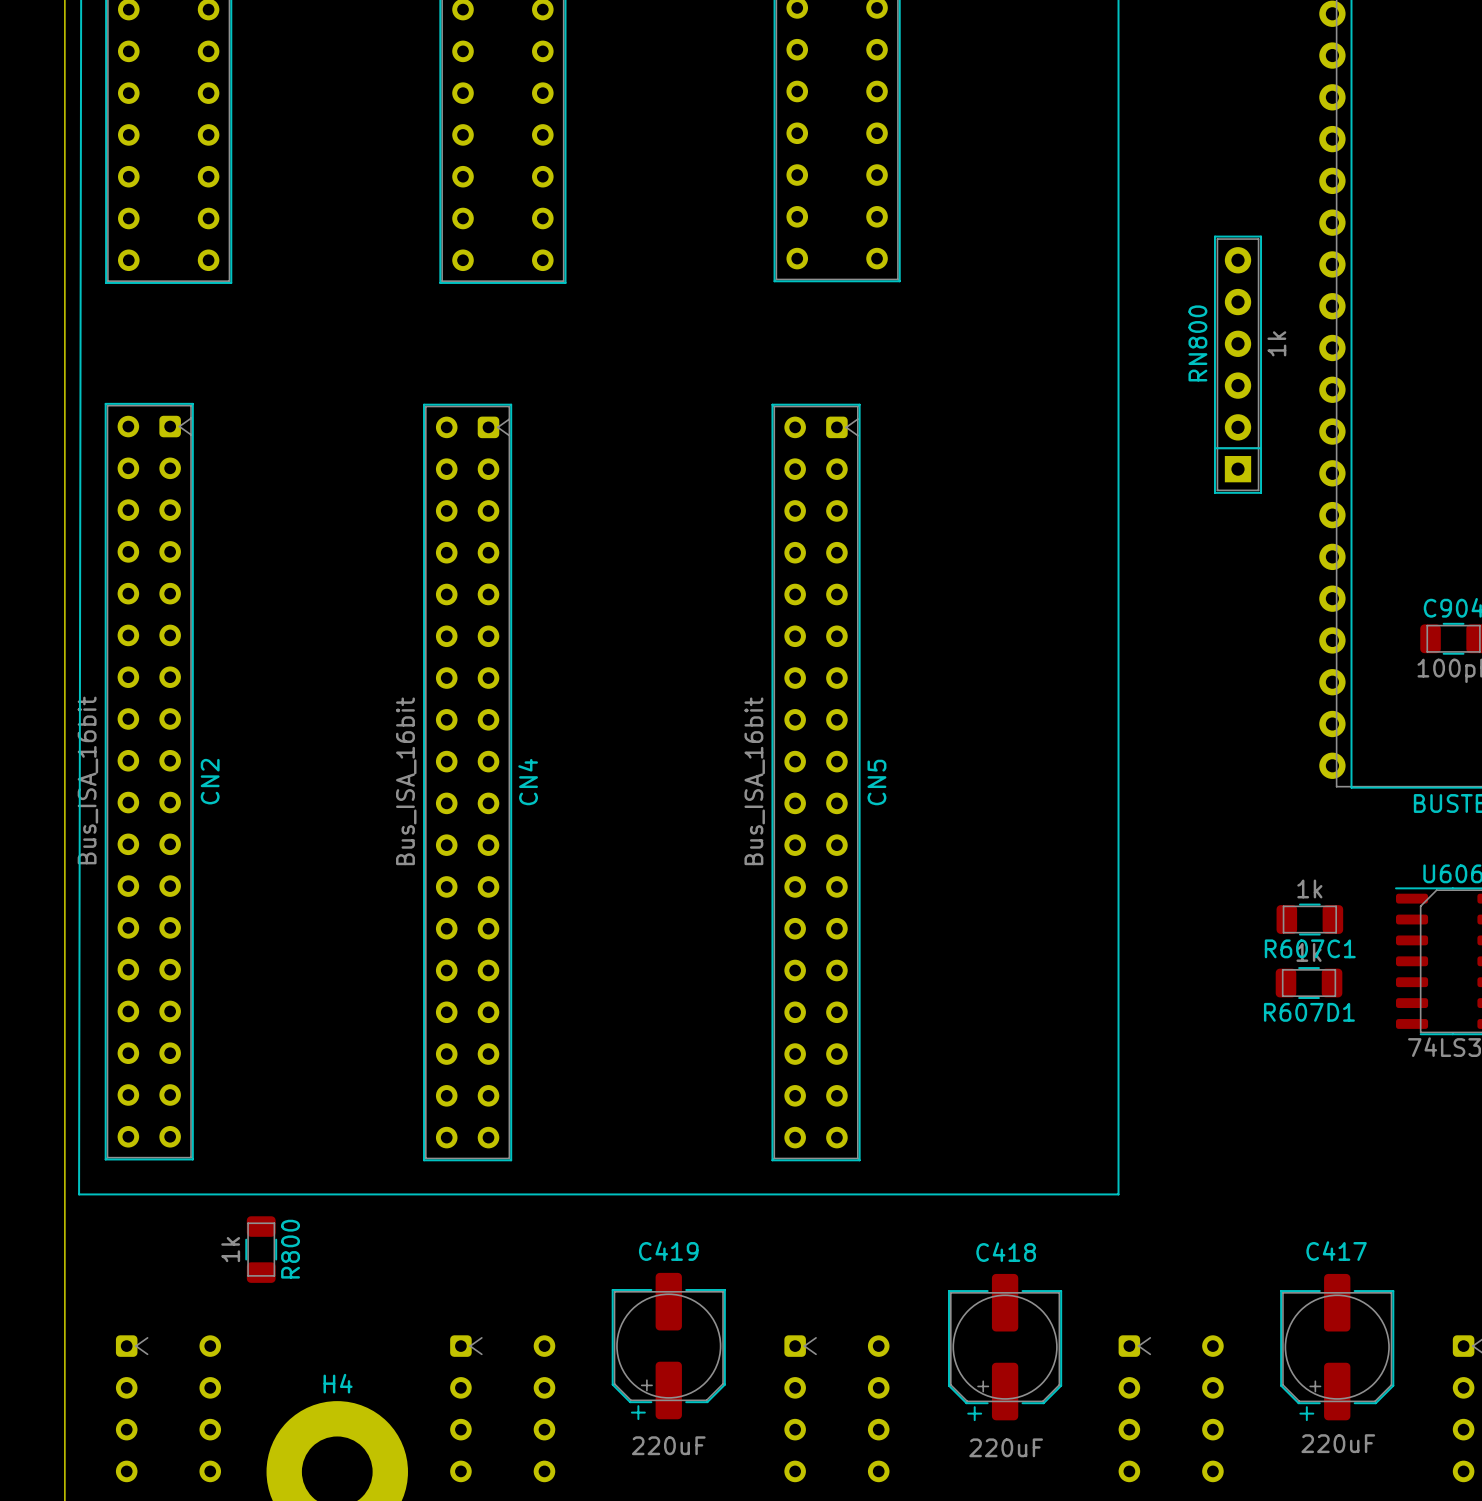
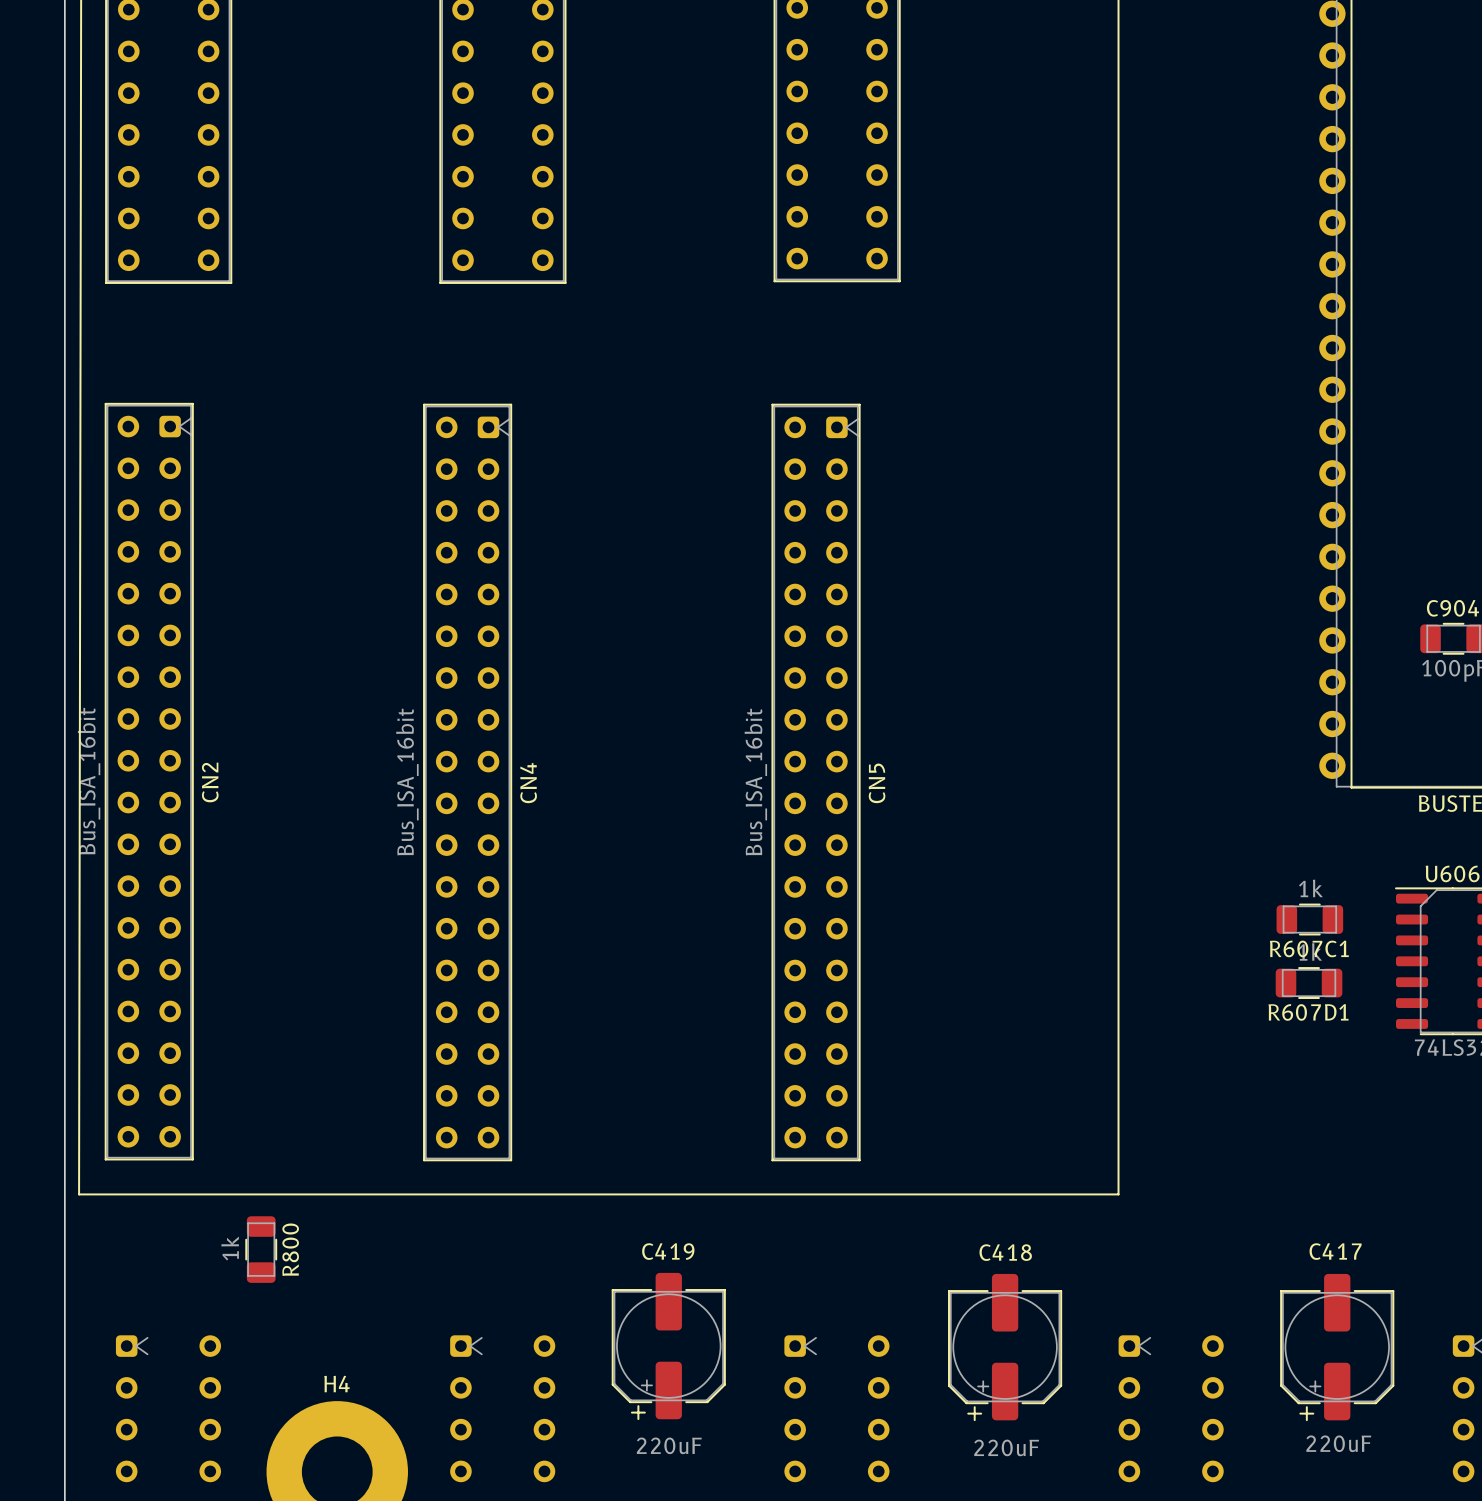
RN800: 1k (1238, 364) -> none

